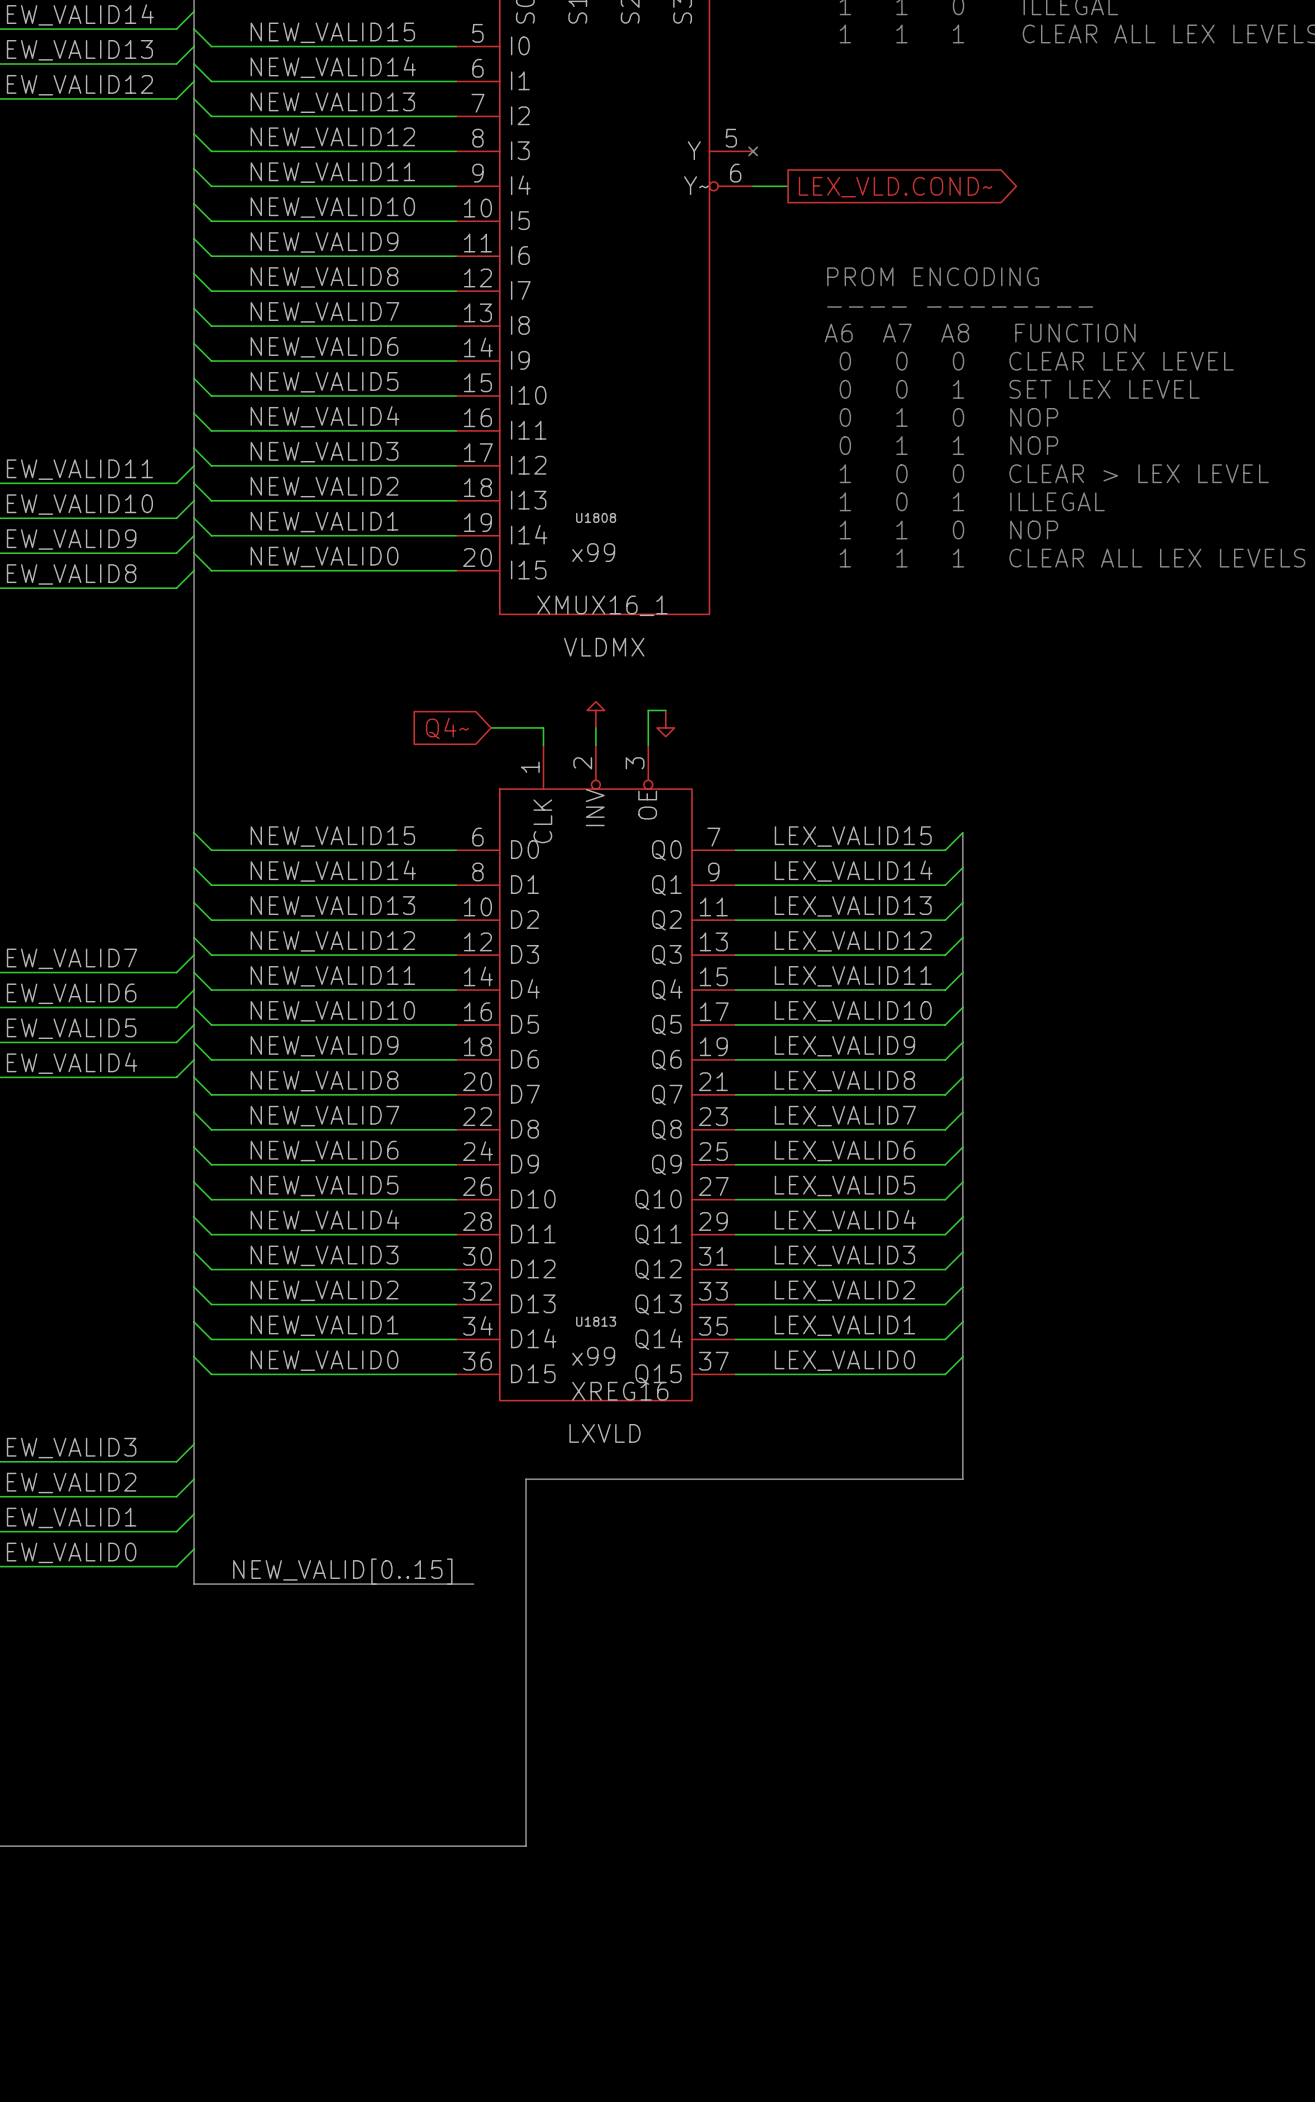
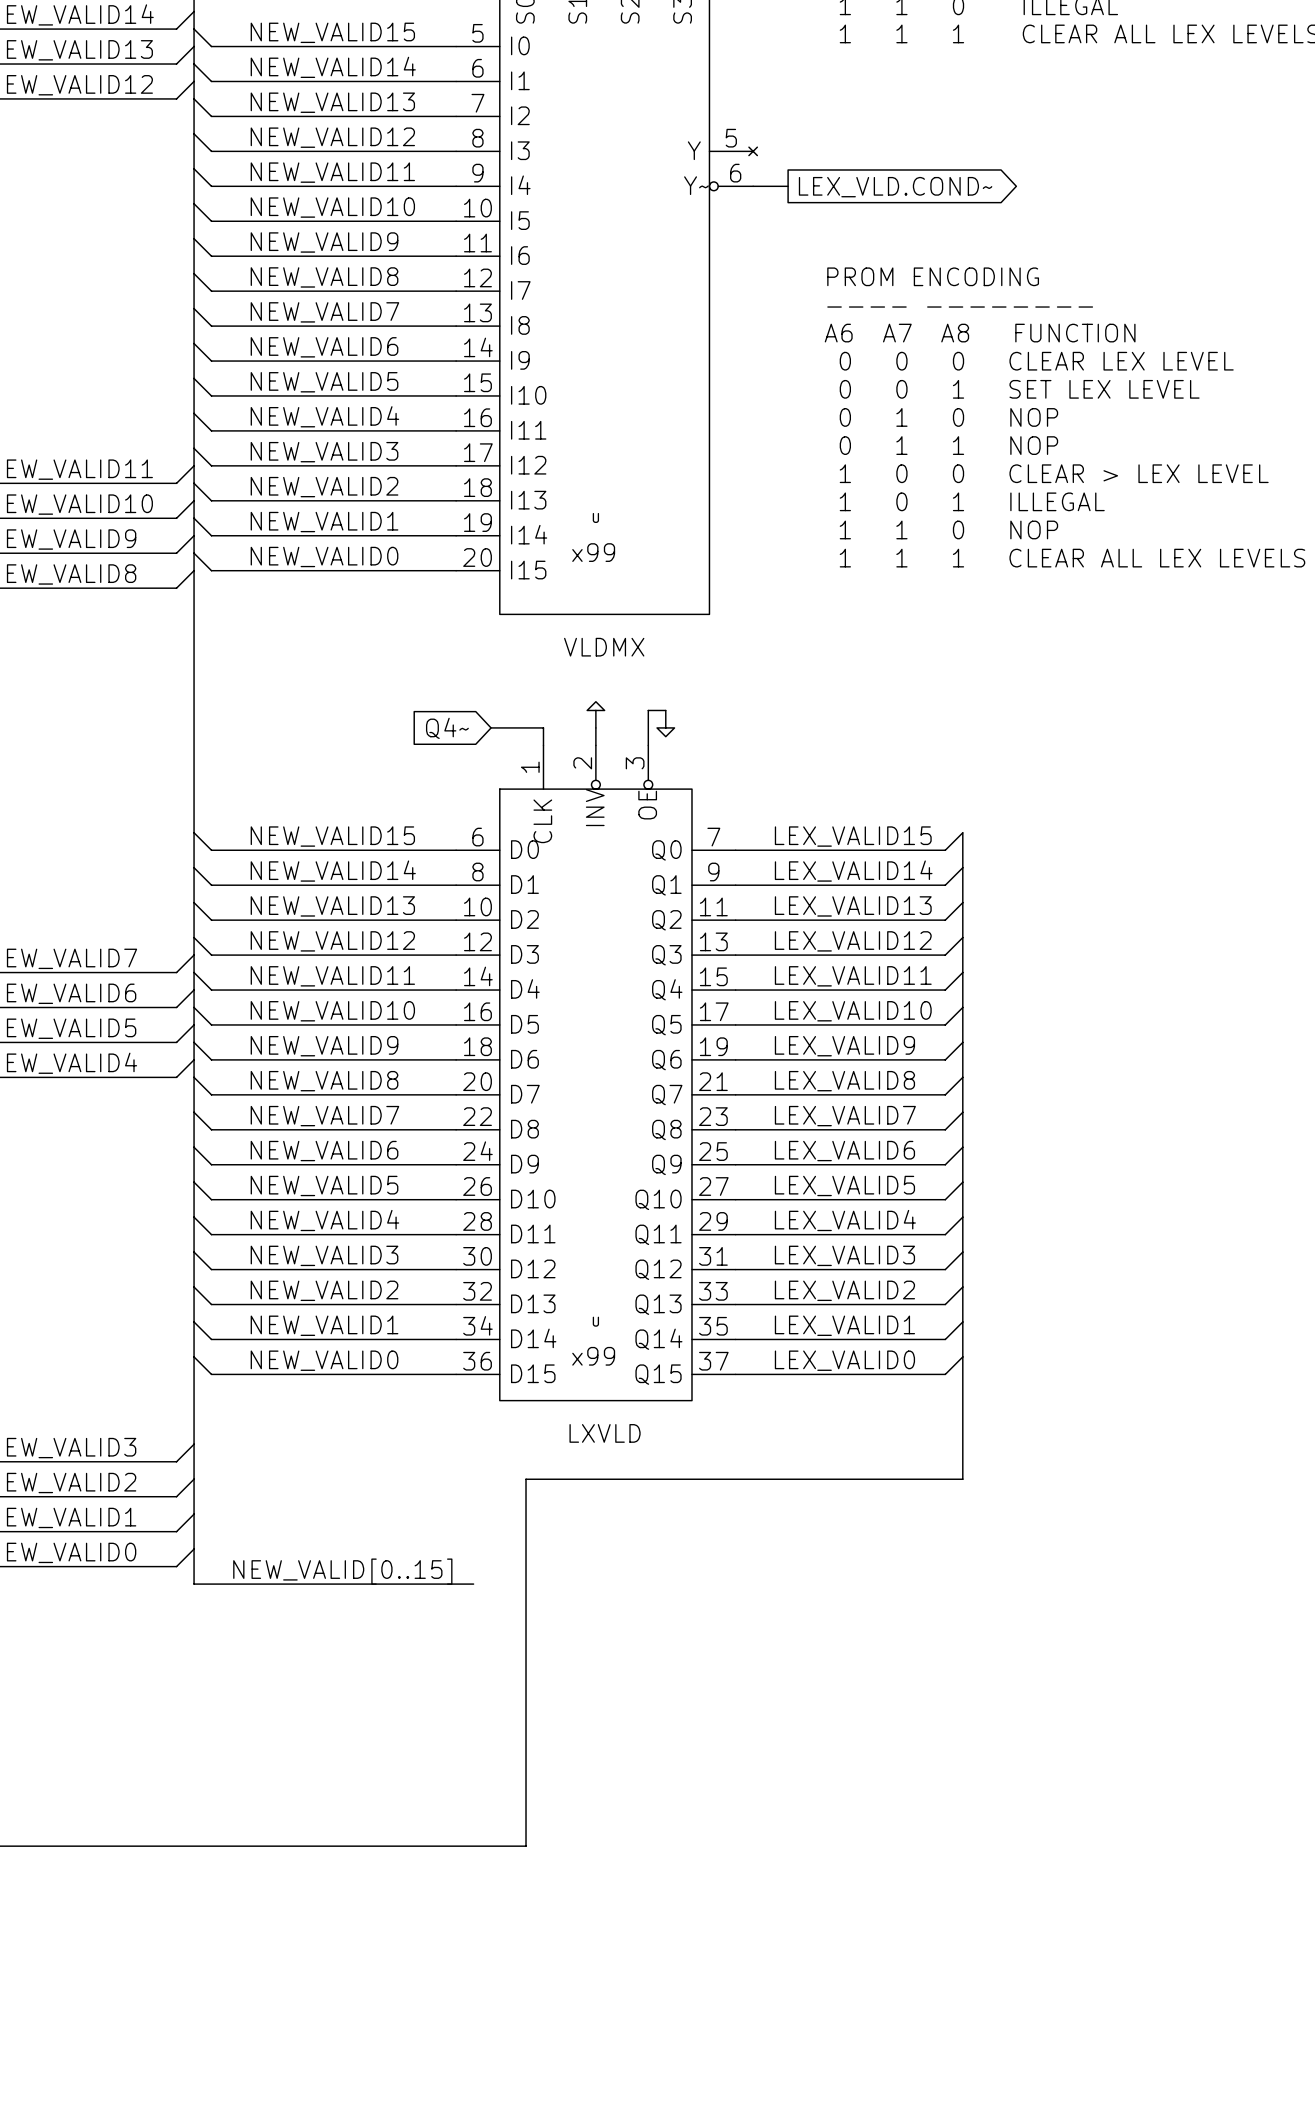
U1808 name: U1808 (596, 517) -> U (595, 517)
U1808 value: XMUX16_1 (602, 605) -> none
U1813 name: U1813 (596, 1321) -> U (595, 1321)
U1813 value: XREG16 (620, 1391) -> none

